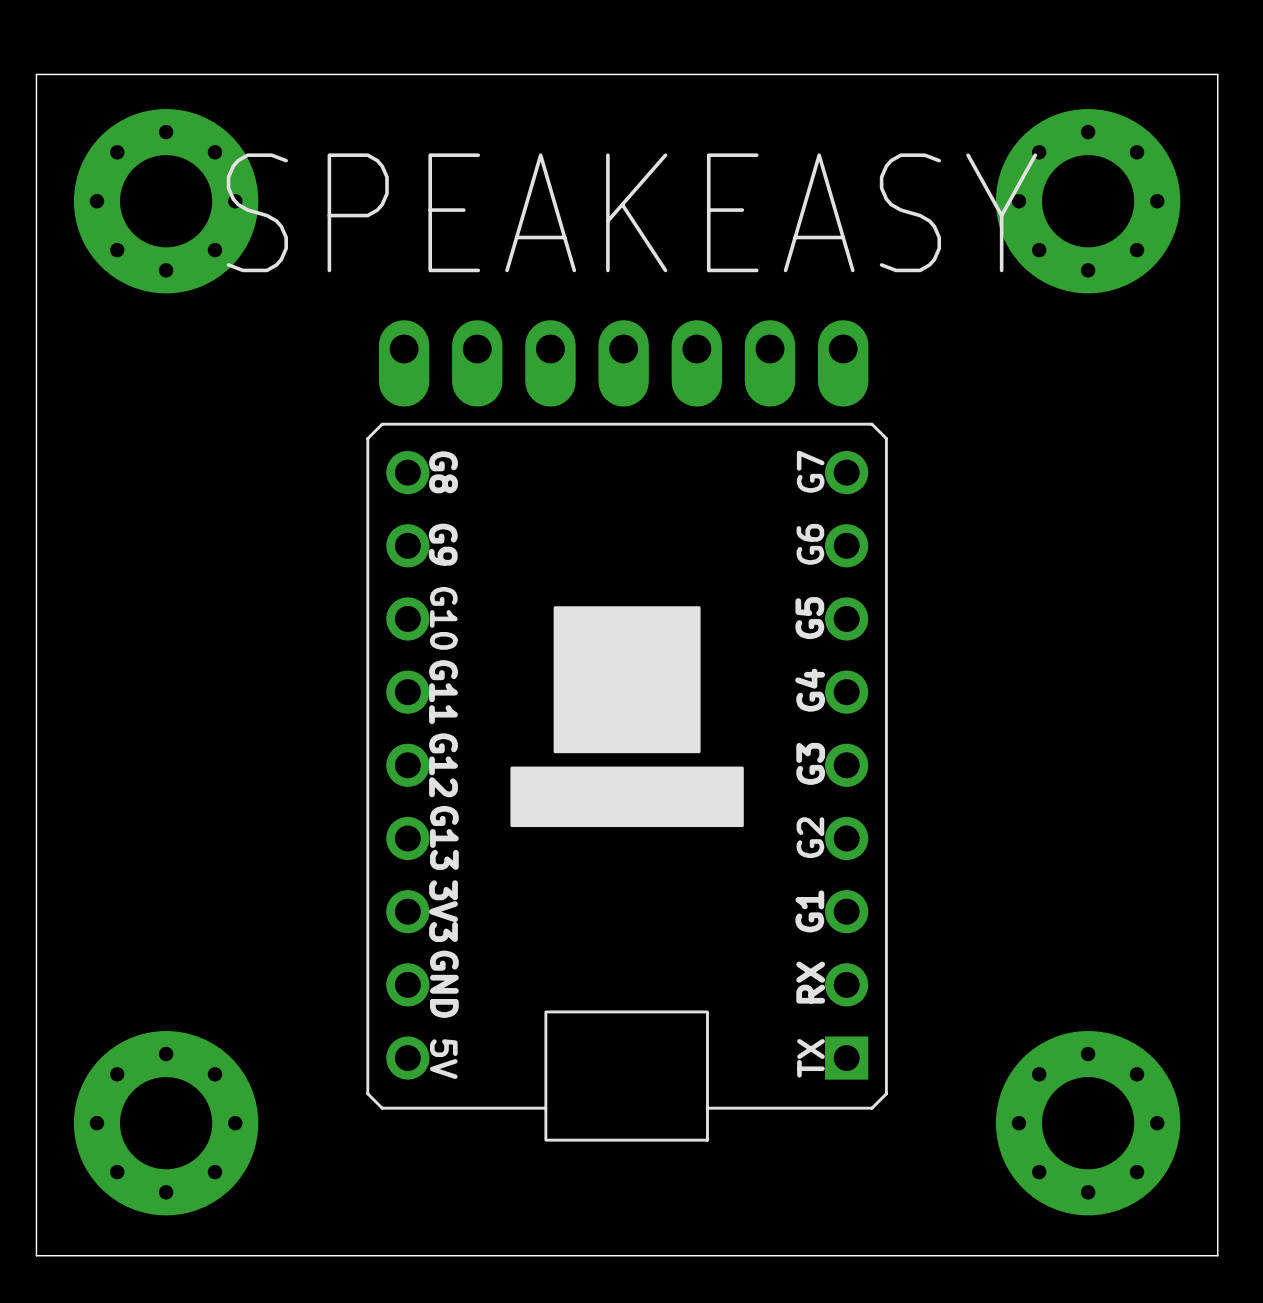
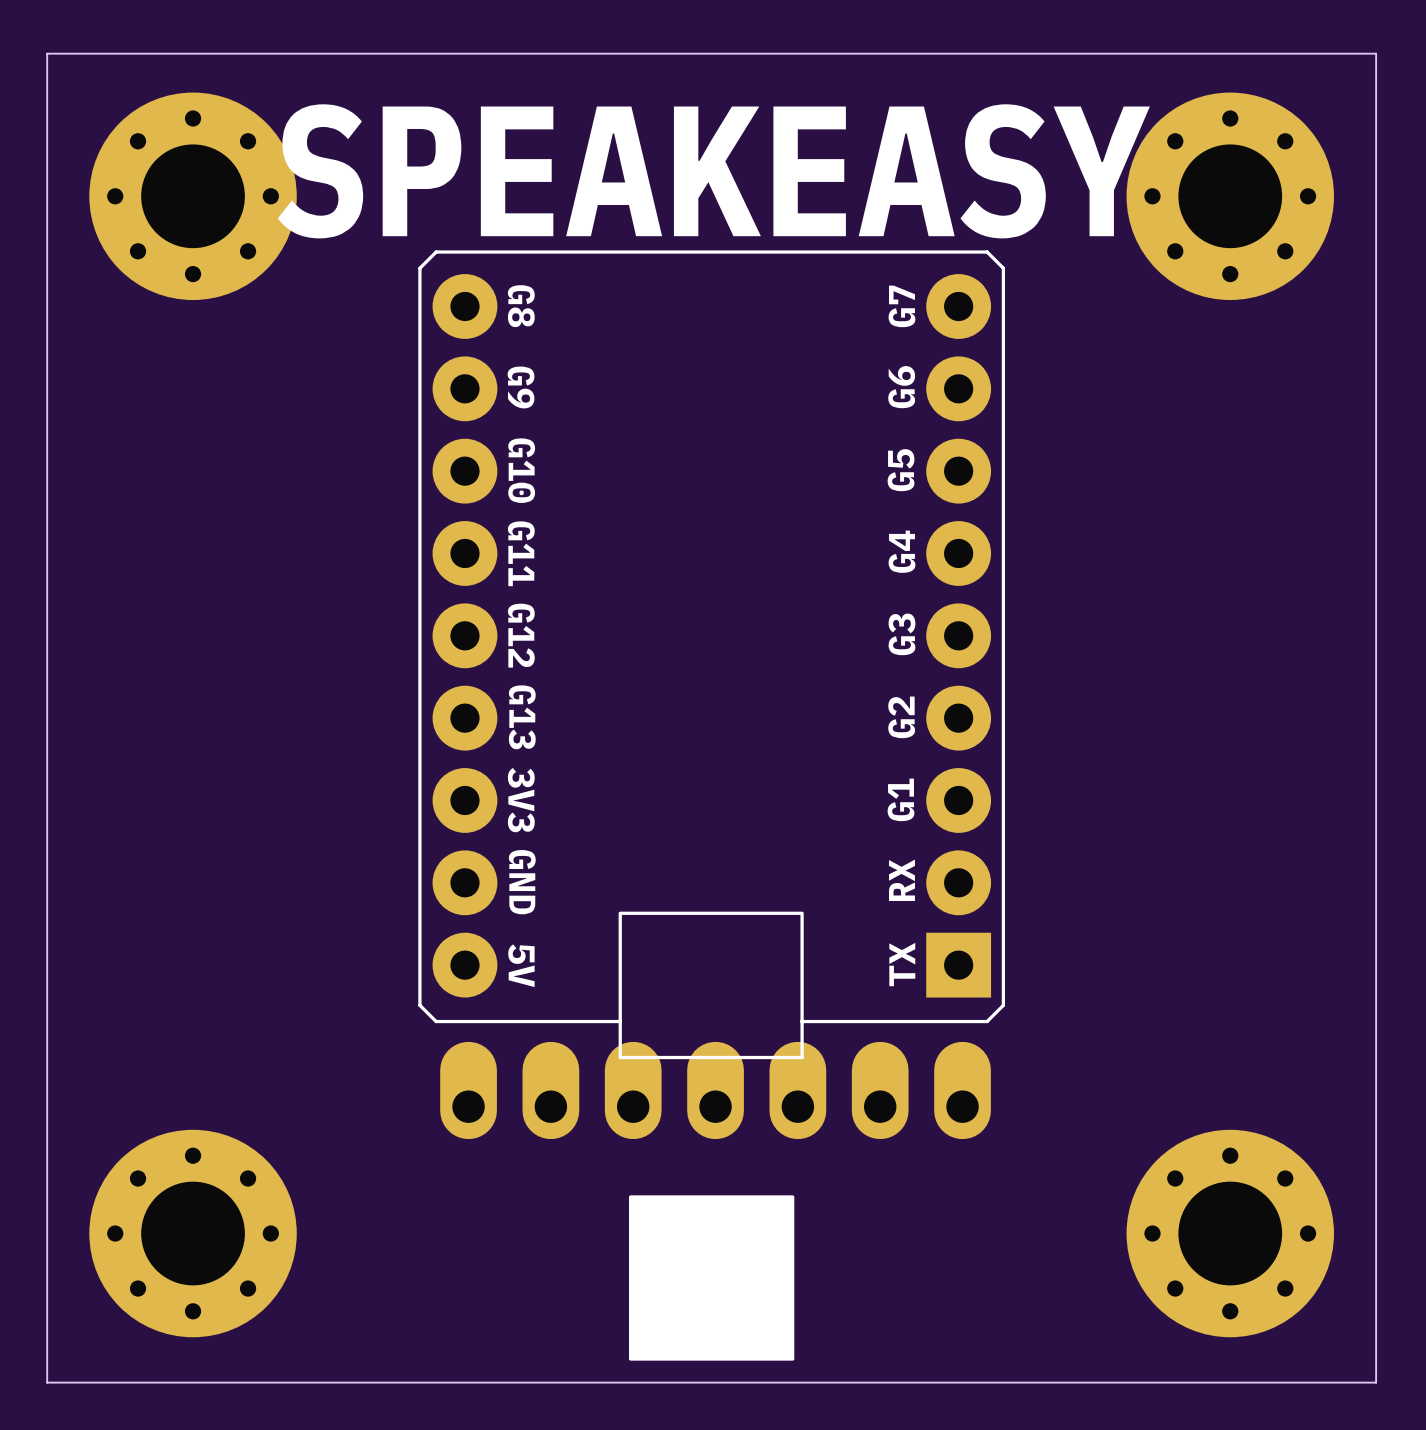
text position: SPEAKEASY (631, 212) -> SPEAKEASY (713, 171)
part rotation: 0° (623, 363) -> 180° (715, 1090)
part position: (623, 363) -> (715, 1090)
part: none -> (711, 654)
drawing position: (627, 679) -> (711, 1277)
drawing: [510, 766, 744, 828] -> none
part: (627, 782) -> none

